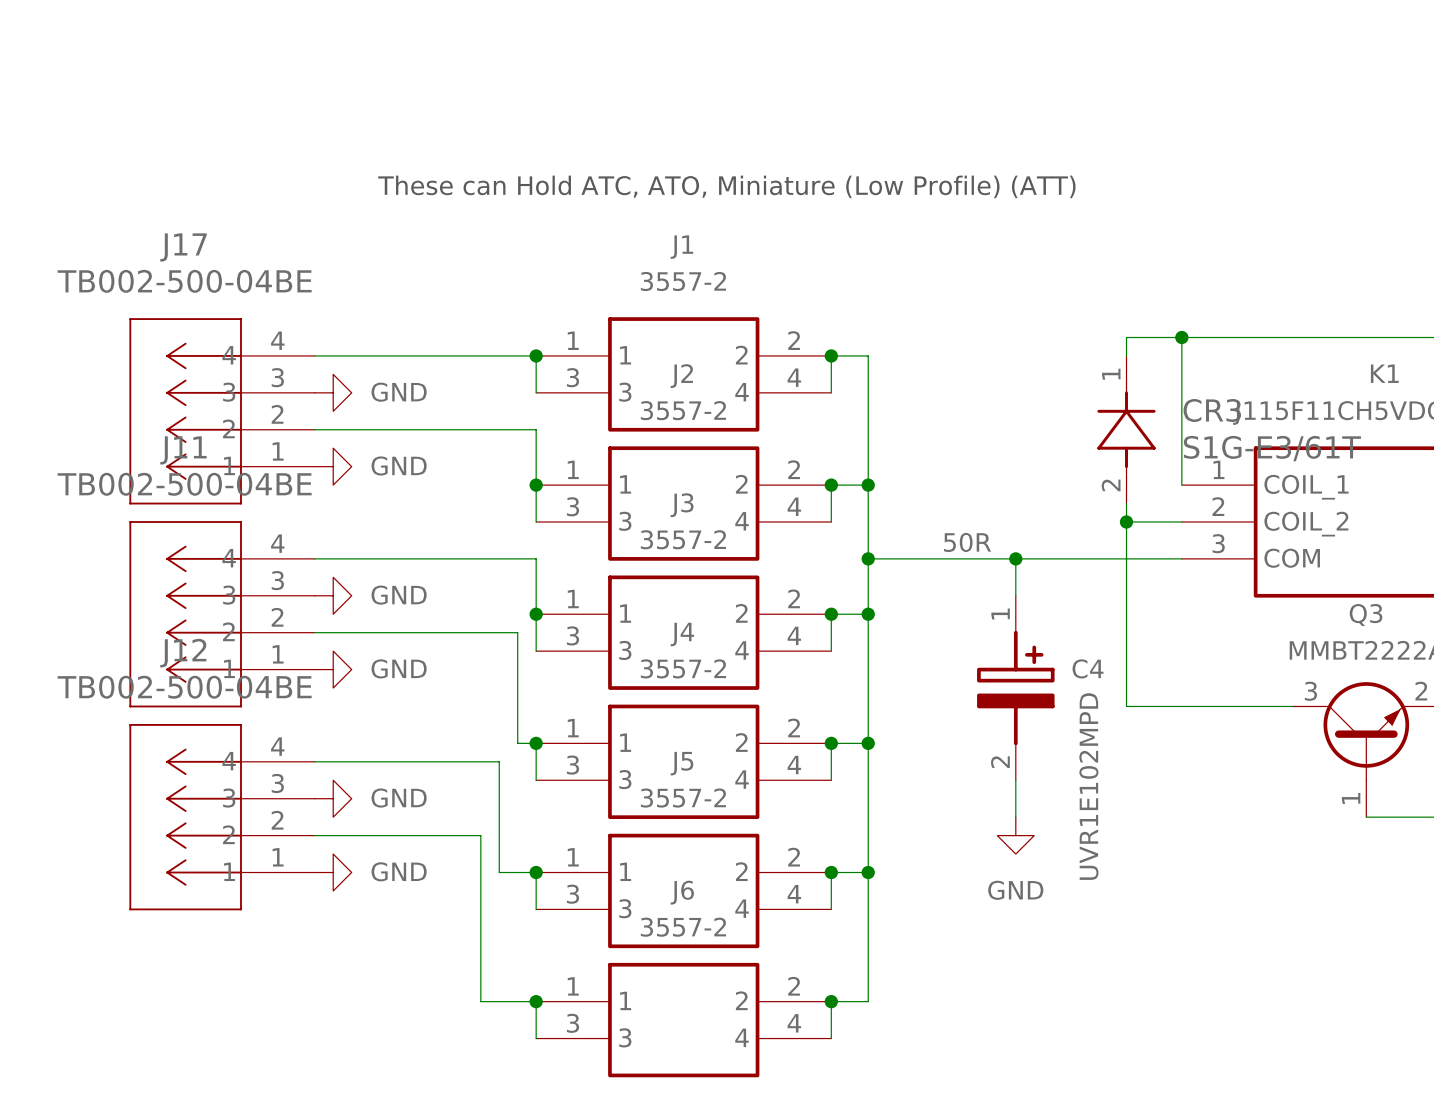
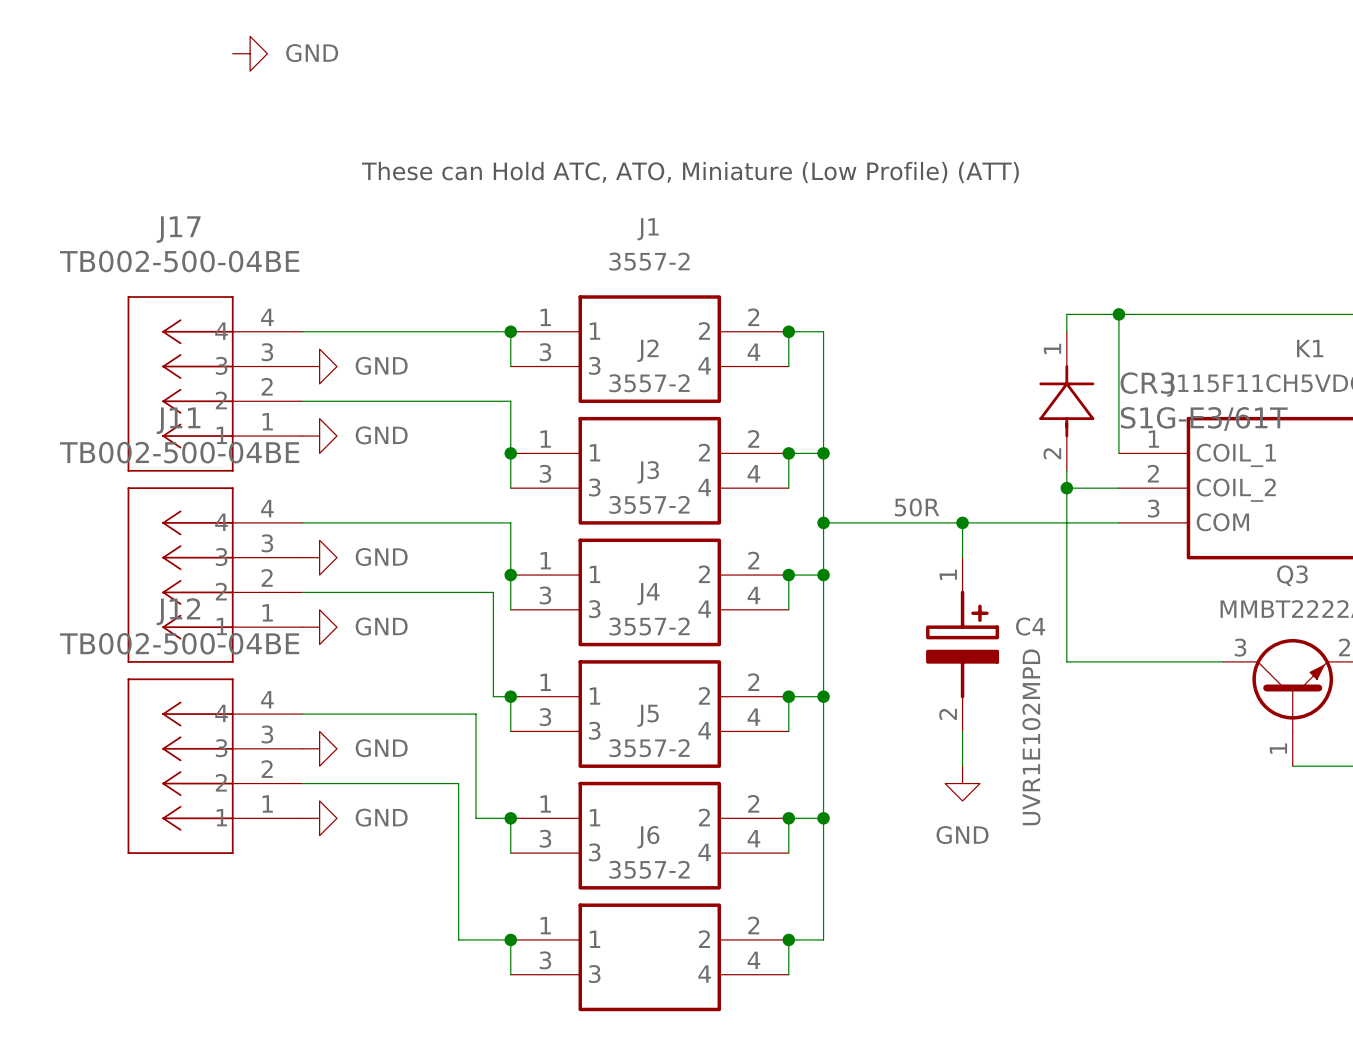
power symbol: none -> GND (250, 53)

